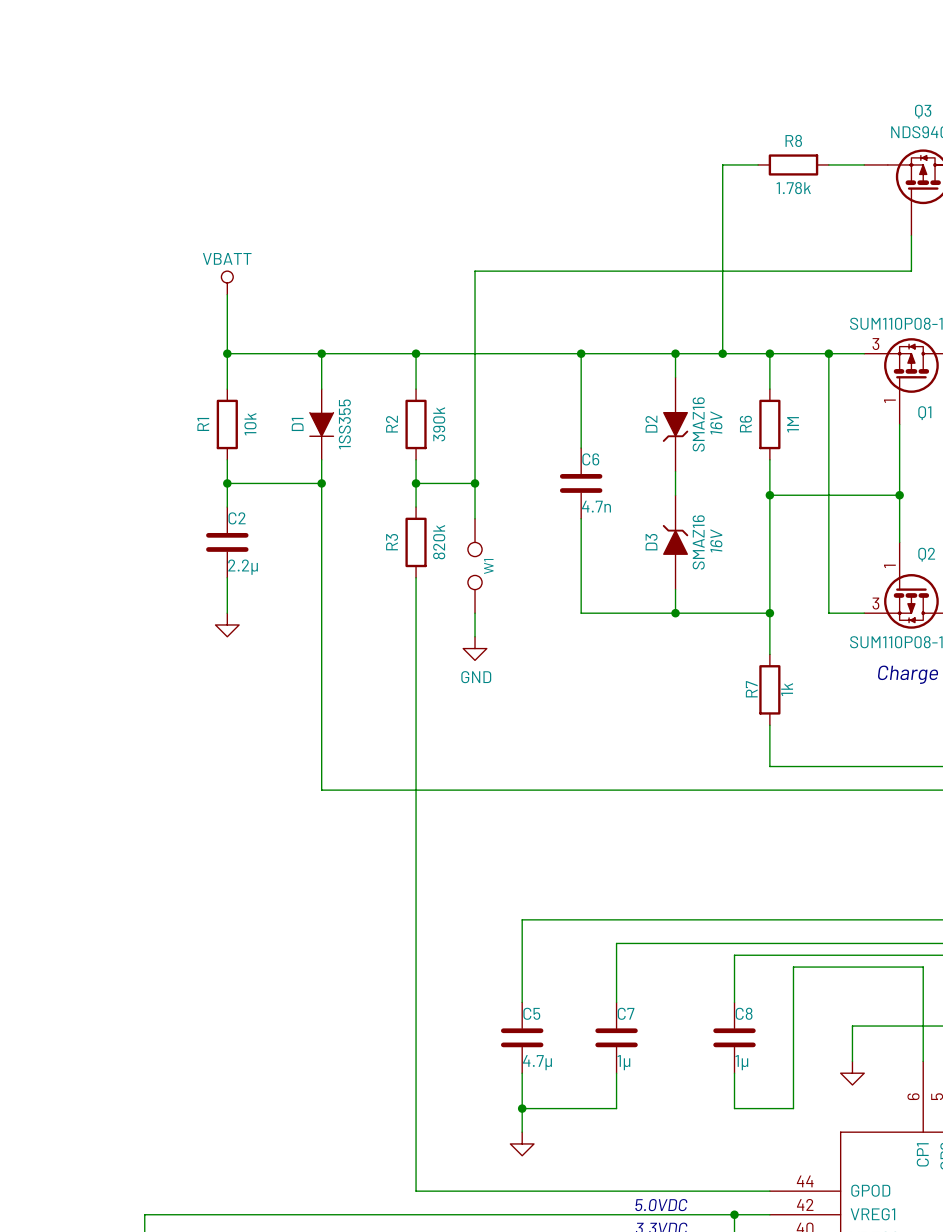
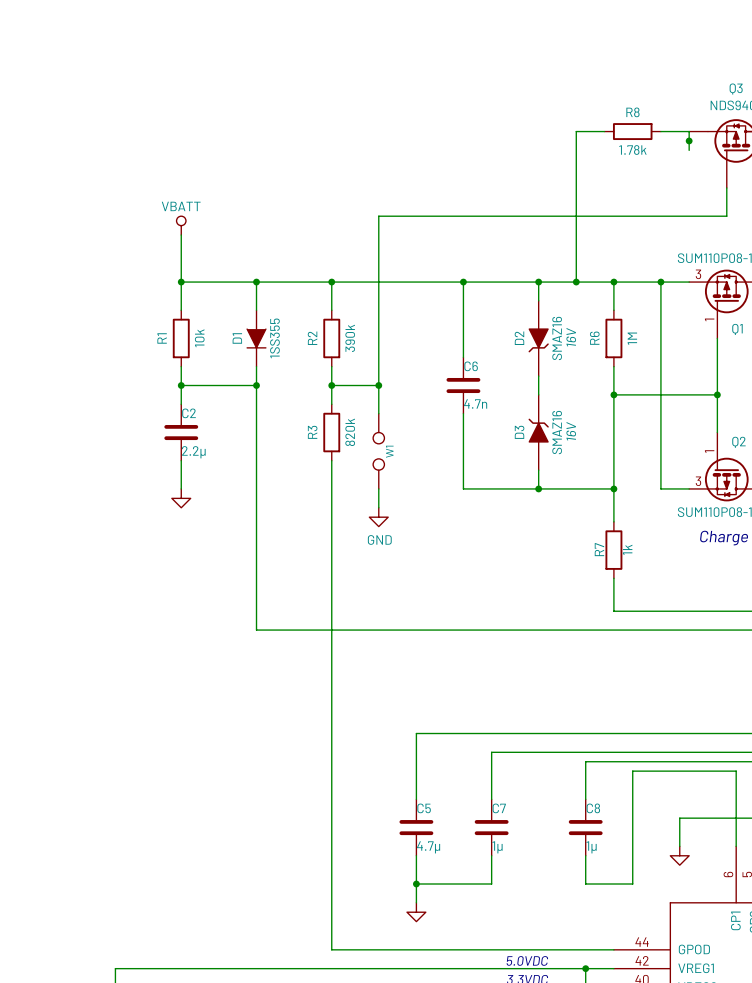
wire: none -> (689, 131) (689, 150)
junction: none -> (689, 140)

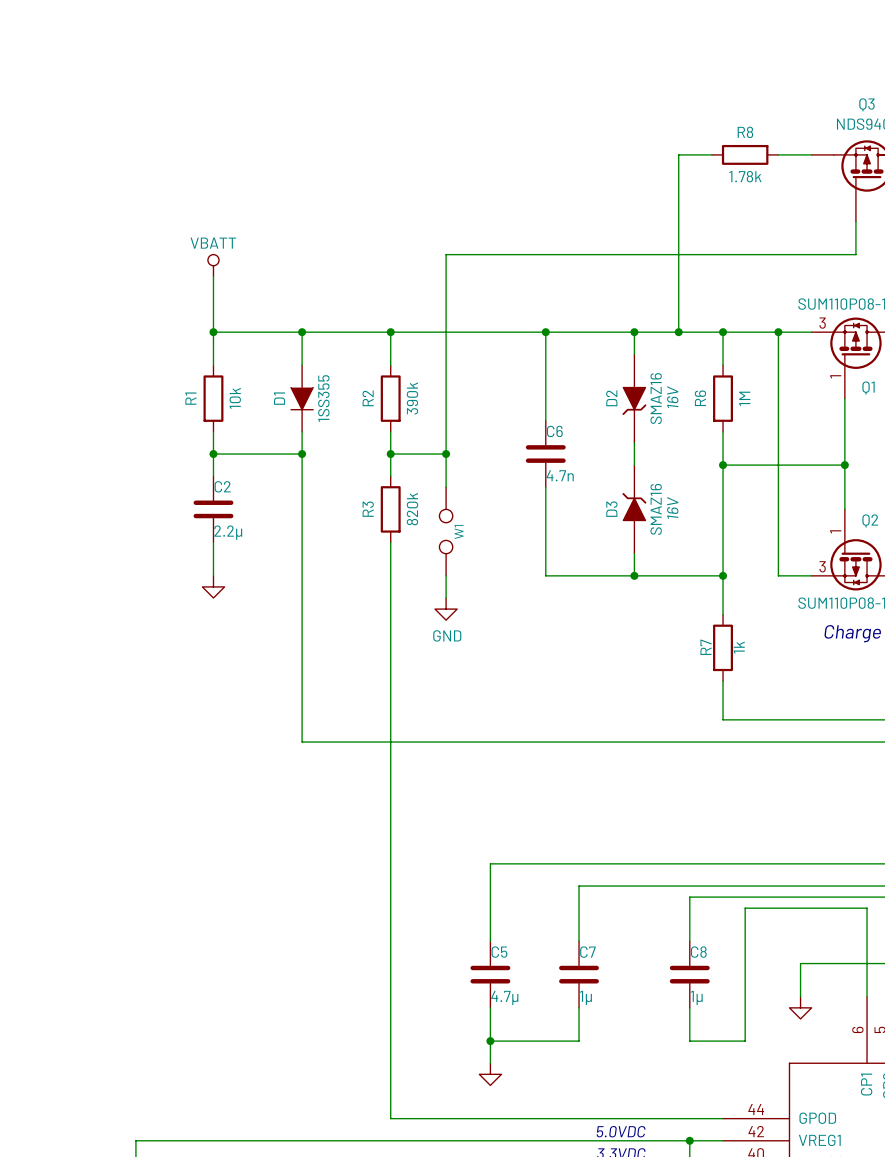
wire: (689, 131) (689, 150) -> none
junction: (689, 140) -> none

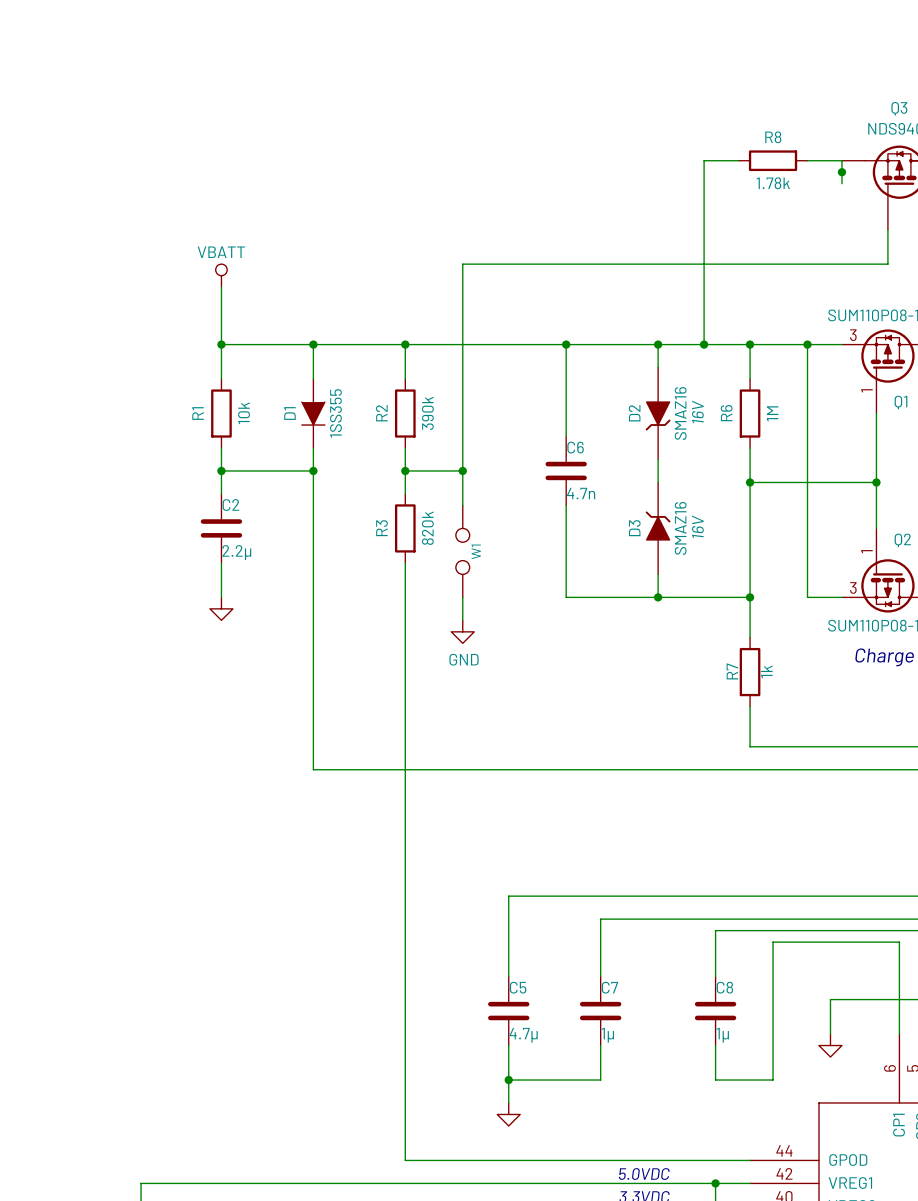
wire: none -> (841, 160) (841, 183)
junction: none -> (841, 172)

